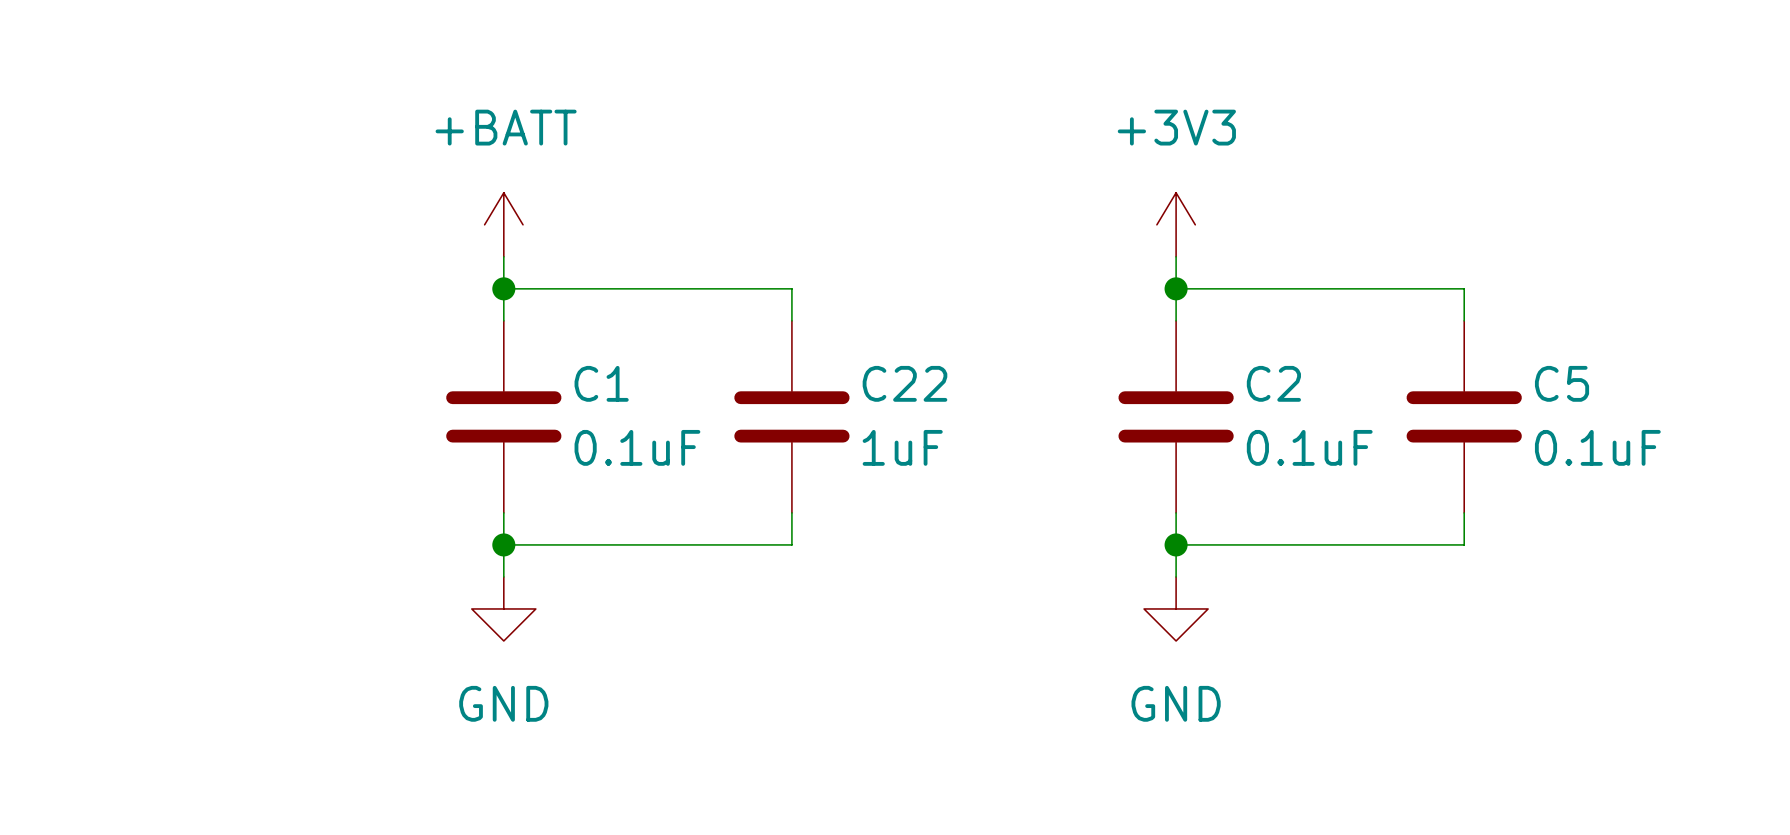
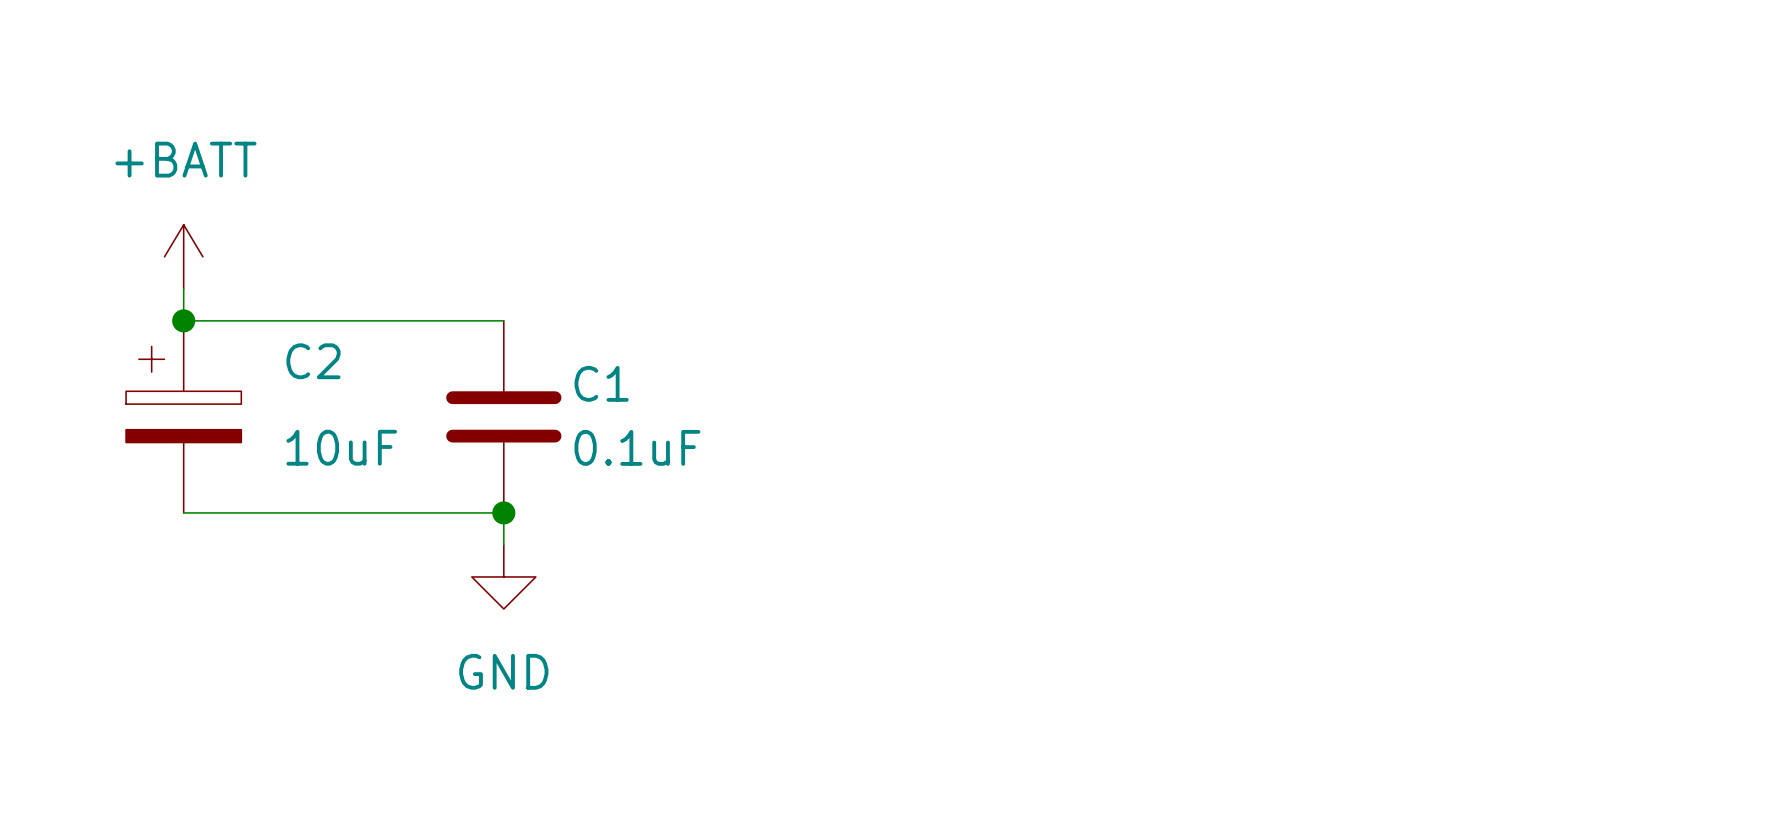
power symbol position: +BATT (503, 224) -> +BATT (183, 256)
power symbol: +3V3 (1176, 224) -> none
wire: (503, 256) (503, 320) -> (183, 288) (183, 320) (503, 320)
wire: (1176, 256) (1176, 320) -> none
wire: (503, 288) (791, 288) (791, 320) -> none
junction: (503, 288) -> none
wire: (1176, 288) (1464, 288) (1464, 320) -> none
junction: (1176, 288) -> none
junction: none -> (183, 320)
C2 symbol: [1118, 320, 1234, 513] -> [126, 320, 242, 513]
C22: 1uF (791, 416) -> none
C5: 0.1uF (1464, 416) -> none
C2 value: 0.1uF (1309, 447) -> 10uF (341, 447)
wire: none -> (183, 512) (503, 512)
wire: (791, 512) (791, 544) (503, 544) (503, 576) -> none
wire: (1176, 512) (1176, 576) -> none
wire: (1464, 512) (1464, 544) (1176, 544) -> none
junction position: (503, 544) -> (503, 512)
junction: (1176, 544) -> none
power symbol position: GND (503, 608) -> GND (503, 576)
power symbol: GND (1176, 608) -> none

